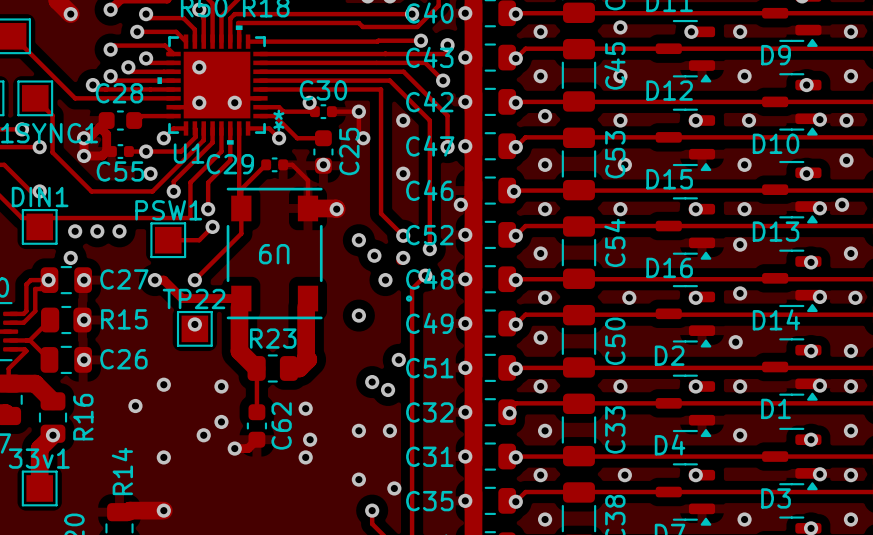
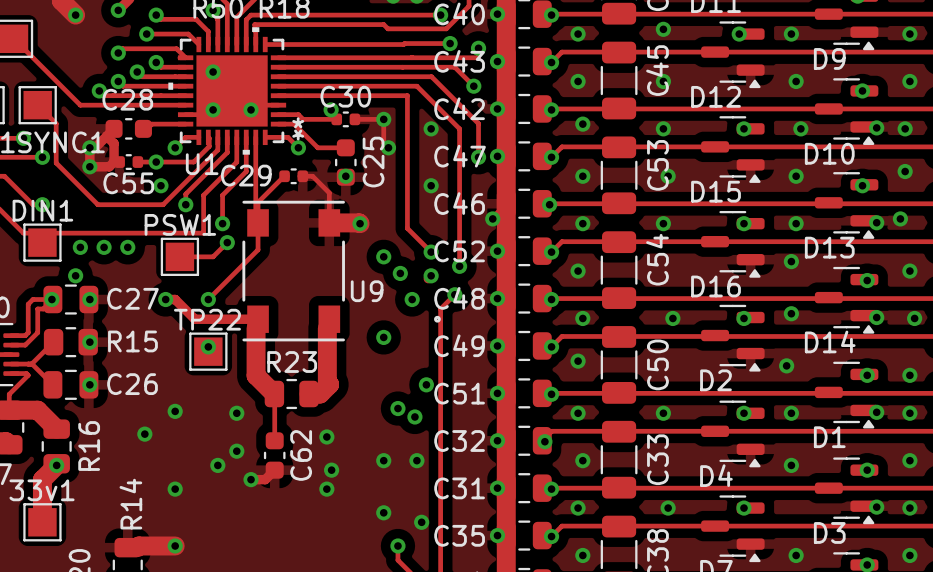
U9 name rotation: 0° (274, 254) -> 180° (367, 291)
U9 name position: U9 (274, 254) -> U9 (367, 291)

